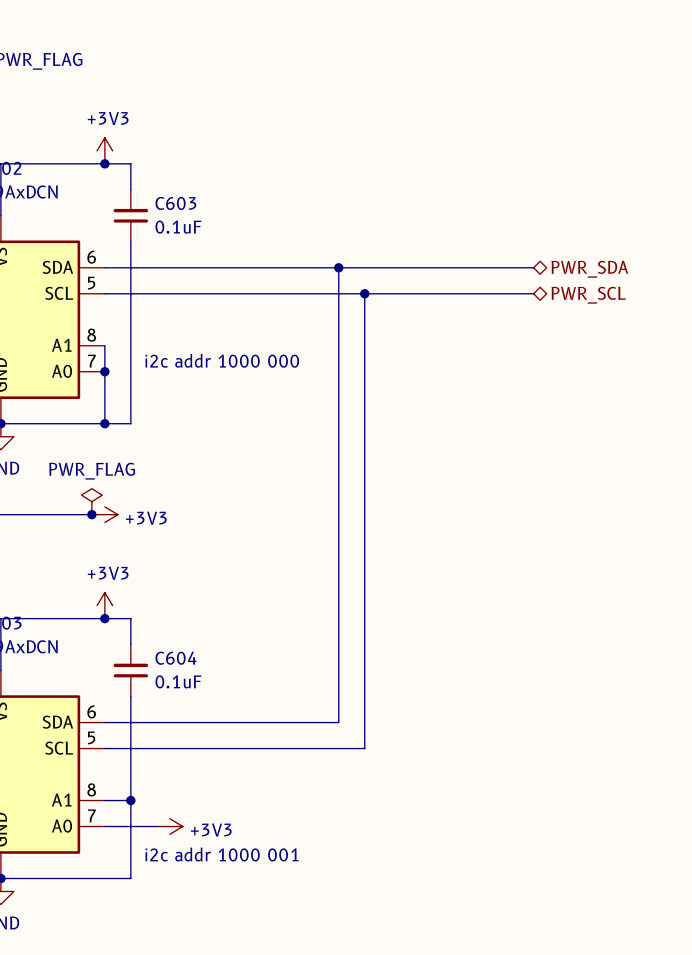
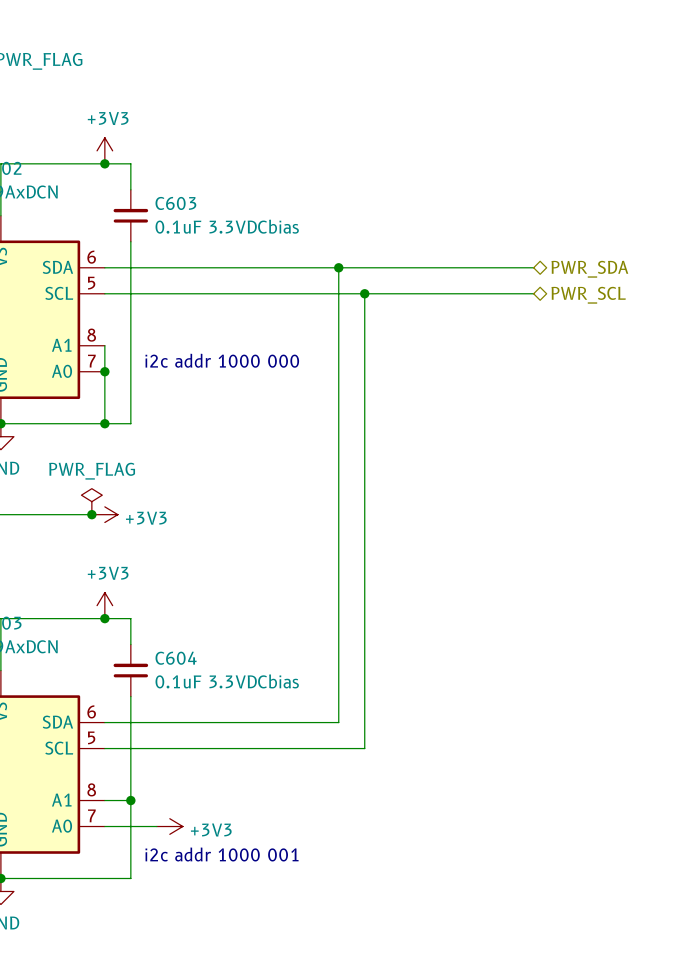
C603 value: 0.1uF (178, 227) -> 0.1uF 3.3VDCbias (227, 226)
C604 value: 0.1uF (178, 681) -> 0.1uF 3.3VDCbias (227, 681)

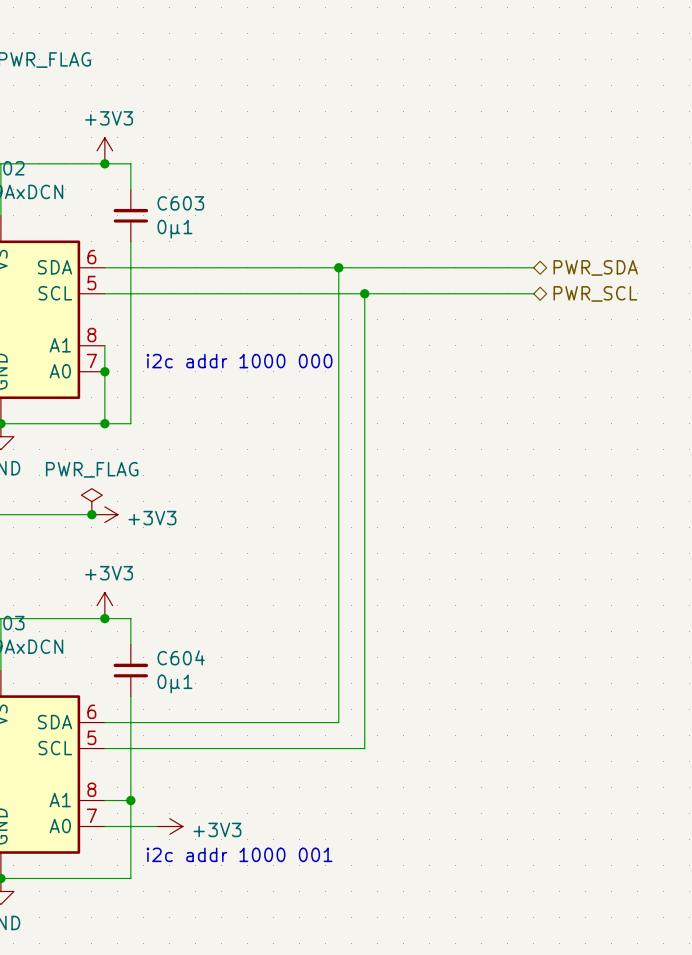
C603 value: 0.1uF 3.3VDCbias (227, 226) -> 0µ1 (174, 229)
C604 value: 0.1uF 3.3VDCbias (227, 681) -> 0µ1 (174, 683)

